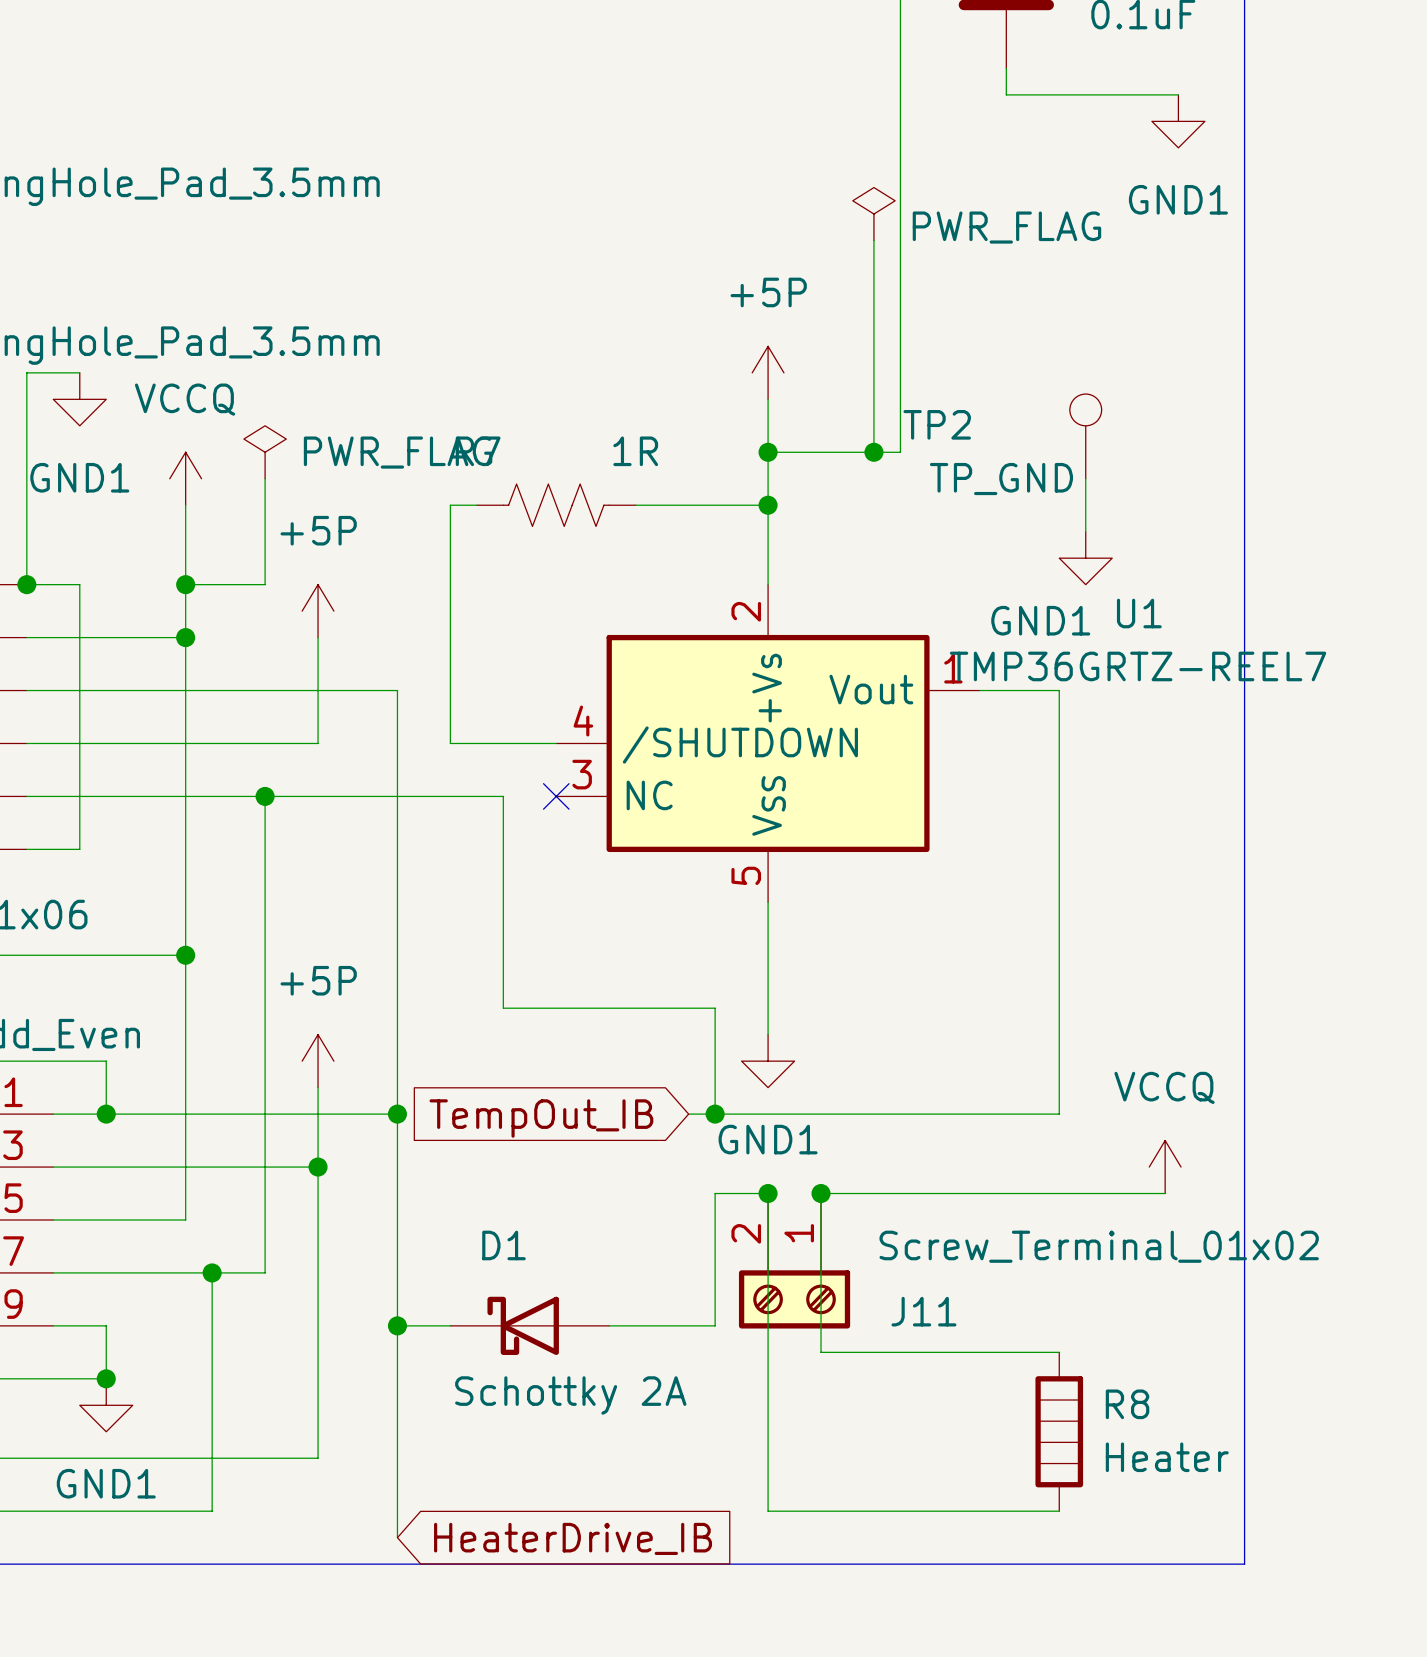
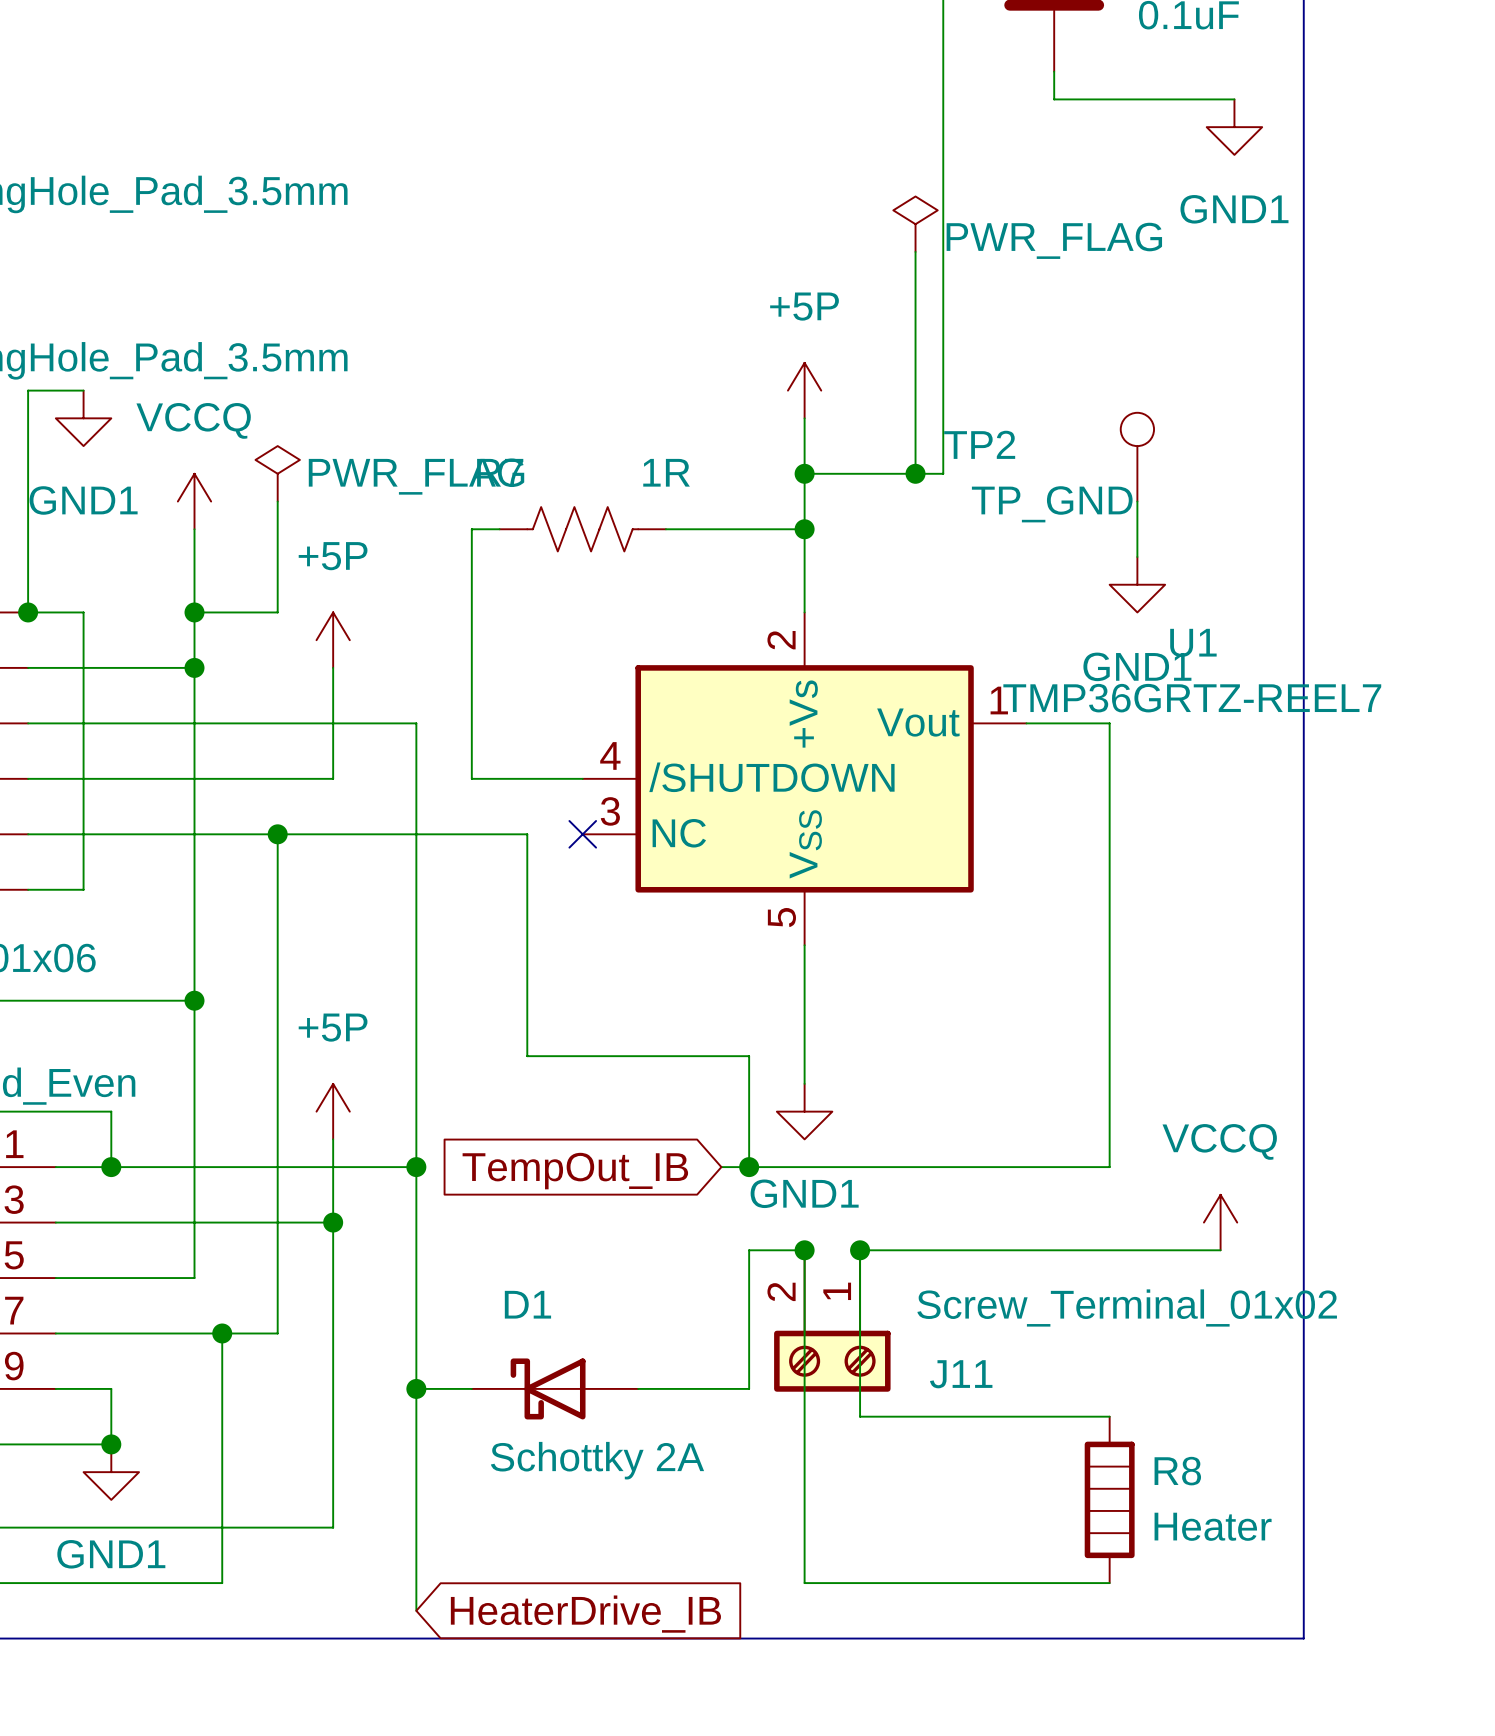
power symbol text position: GND1 (1040, 620) -> GND1 (1137, 666)

